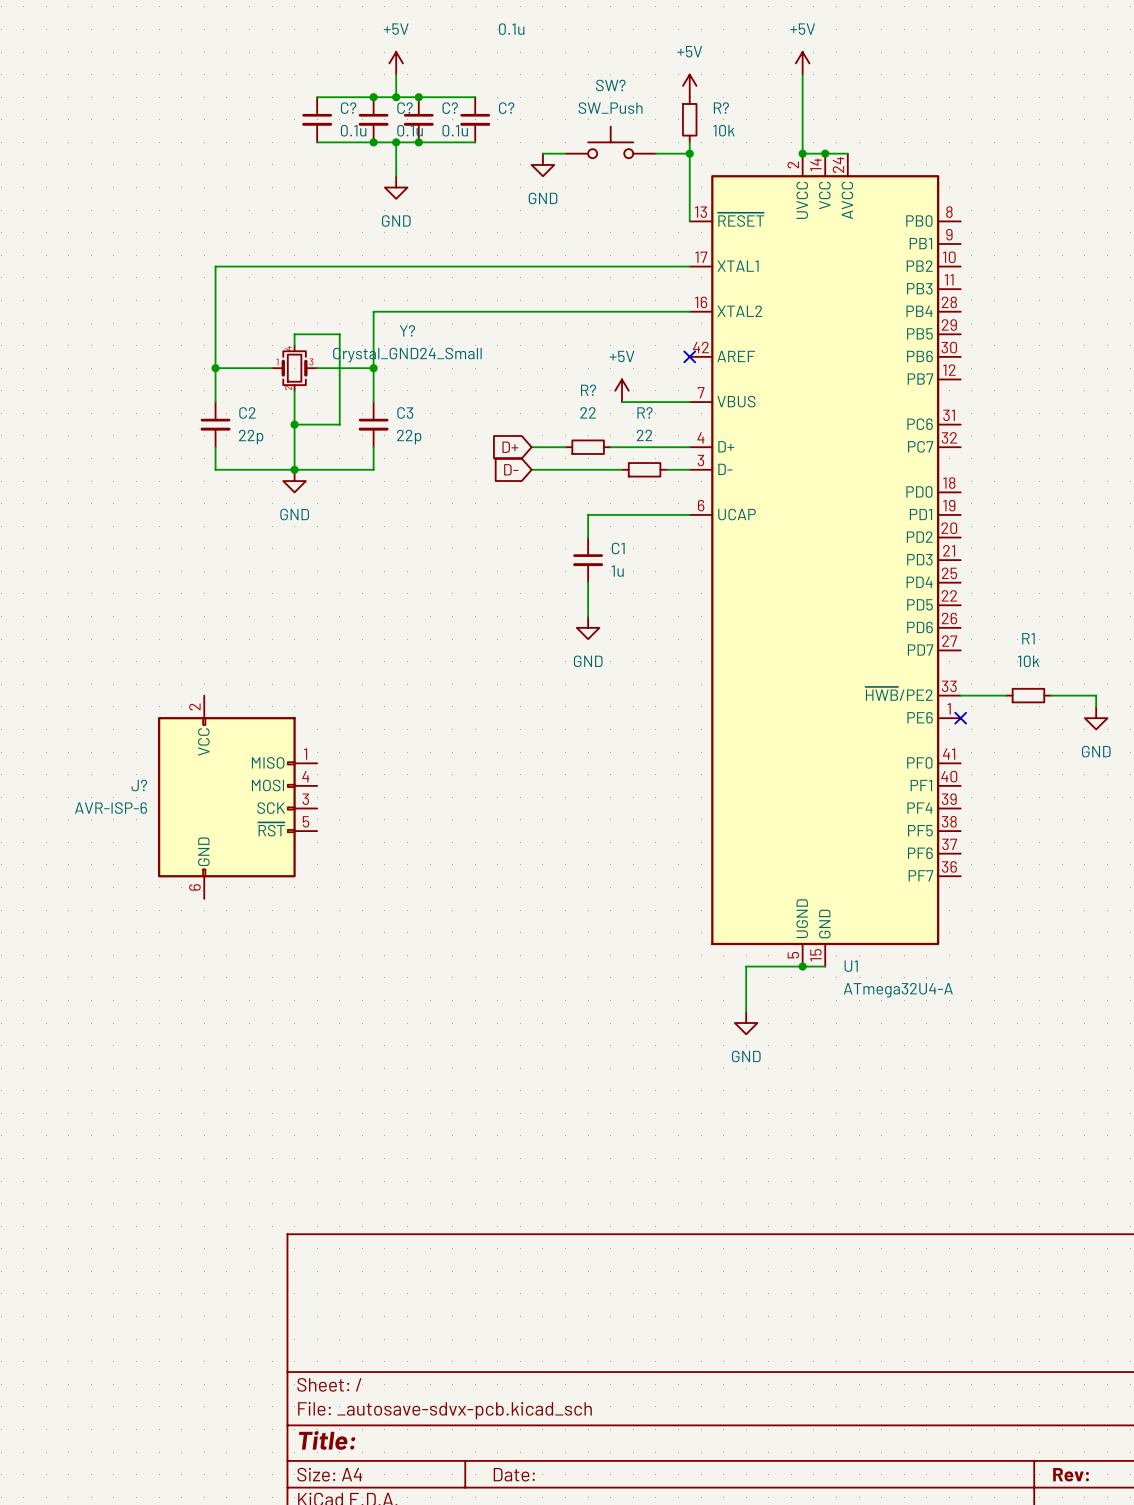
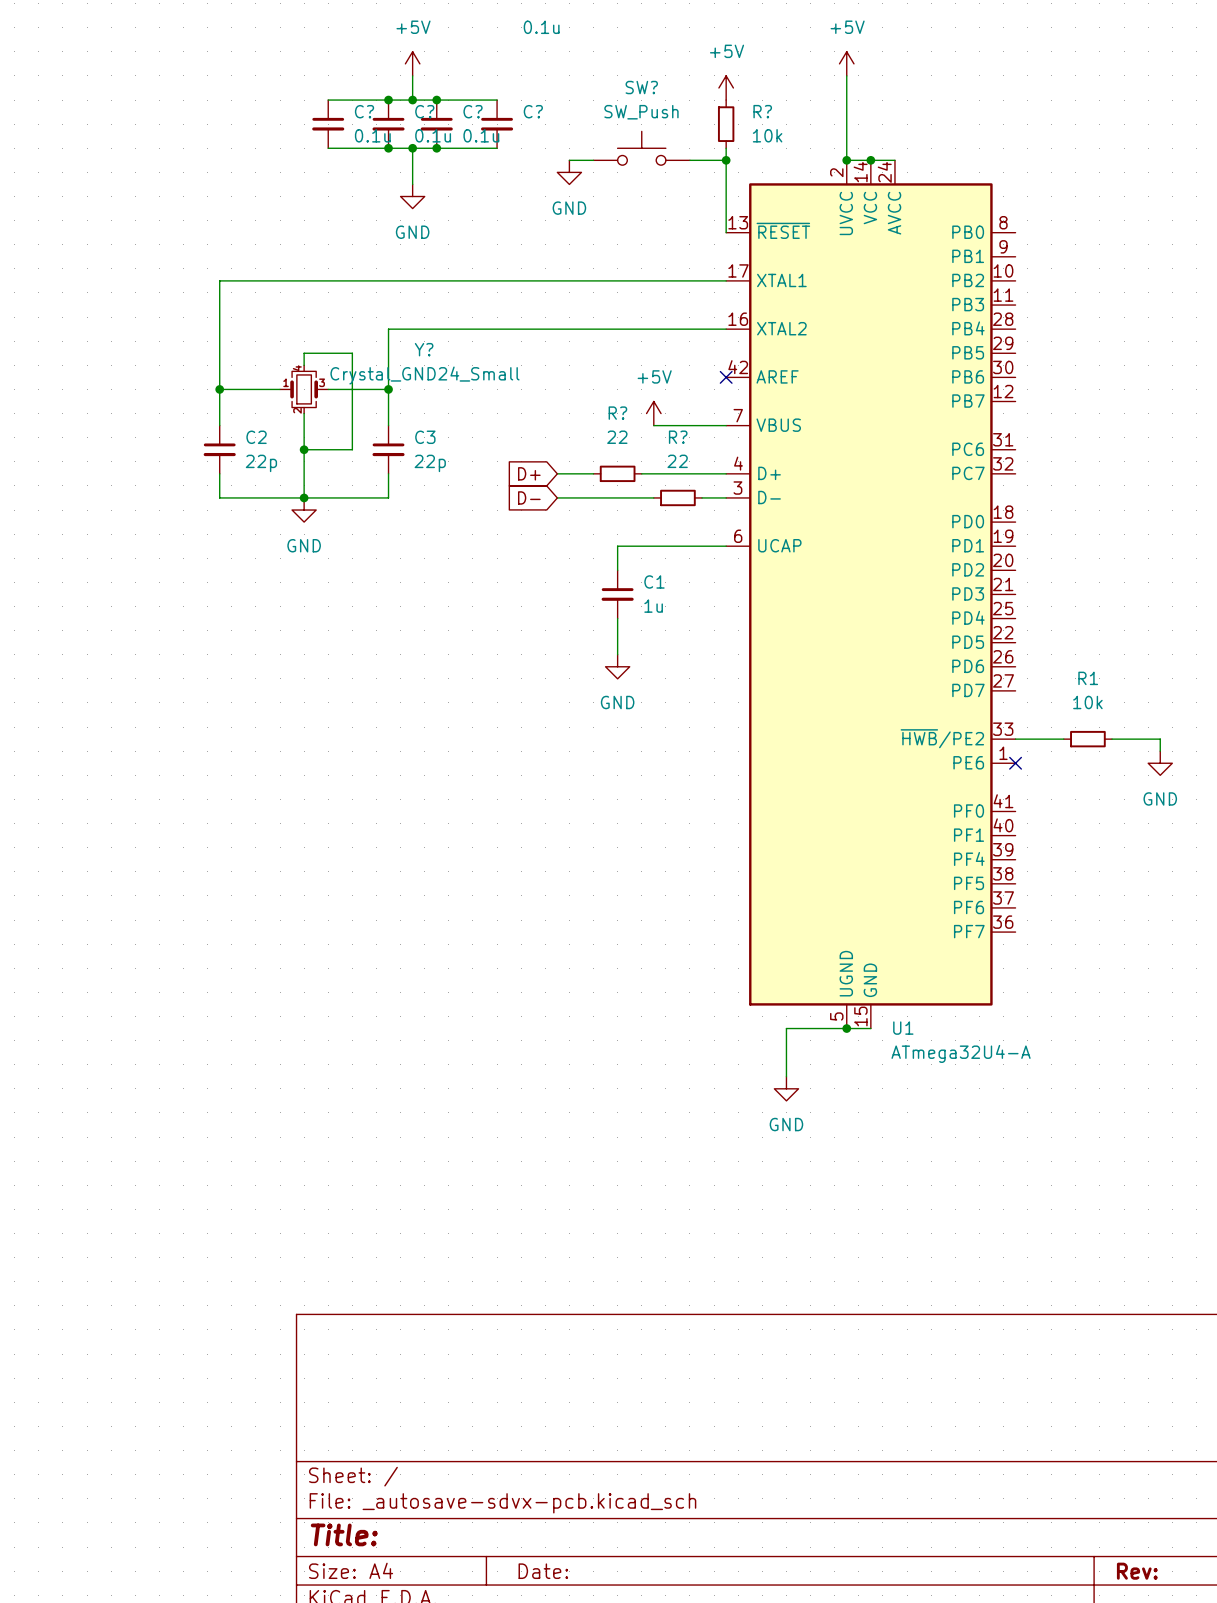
J?: AVR-ISP-6 (237, 797) -> none

